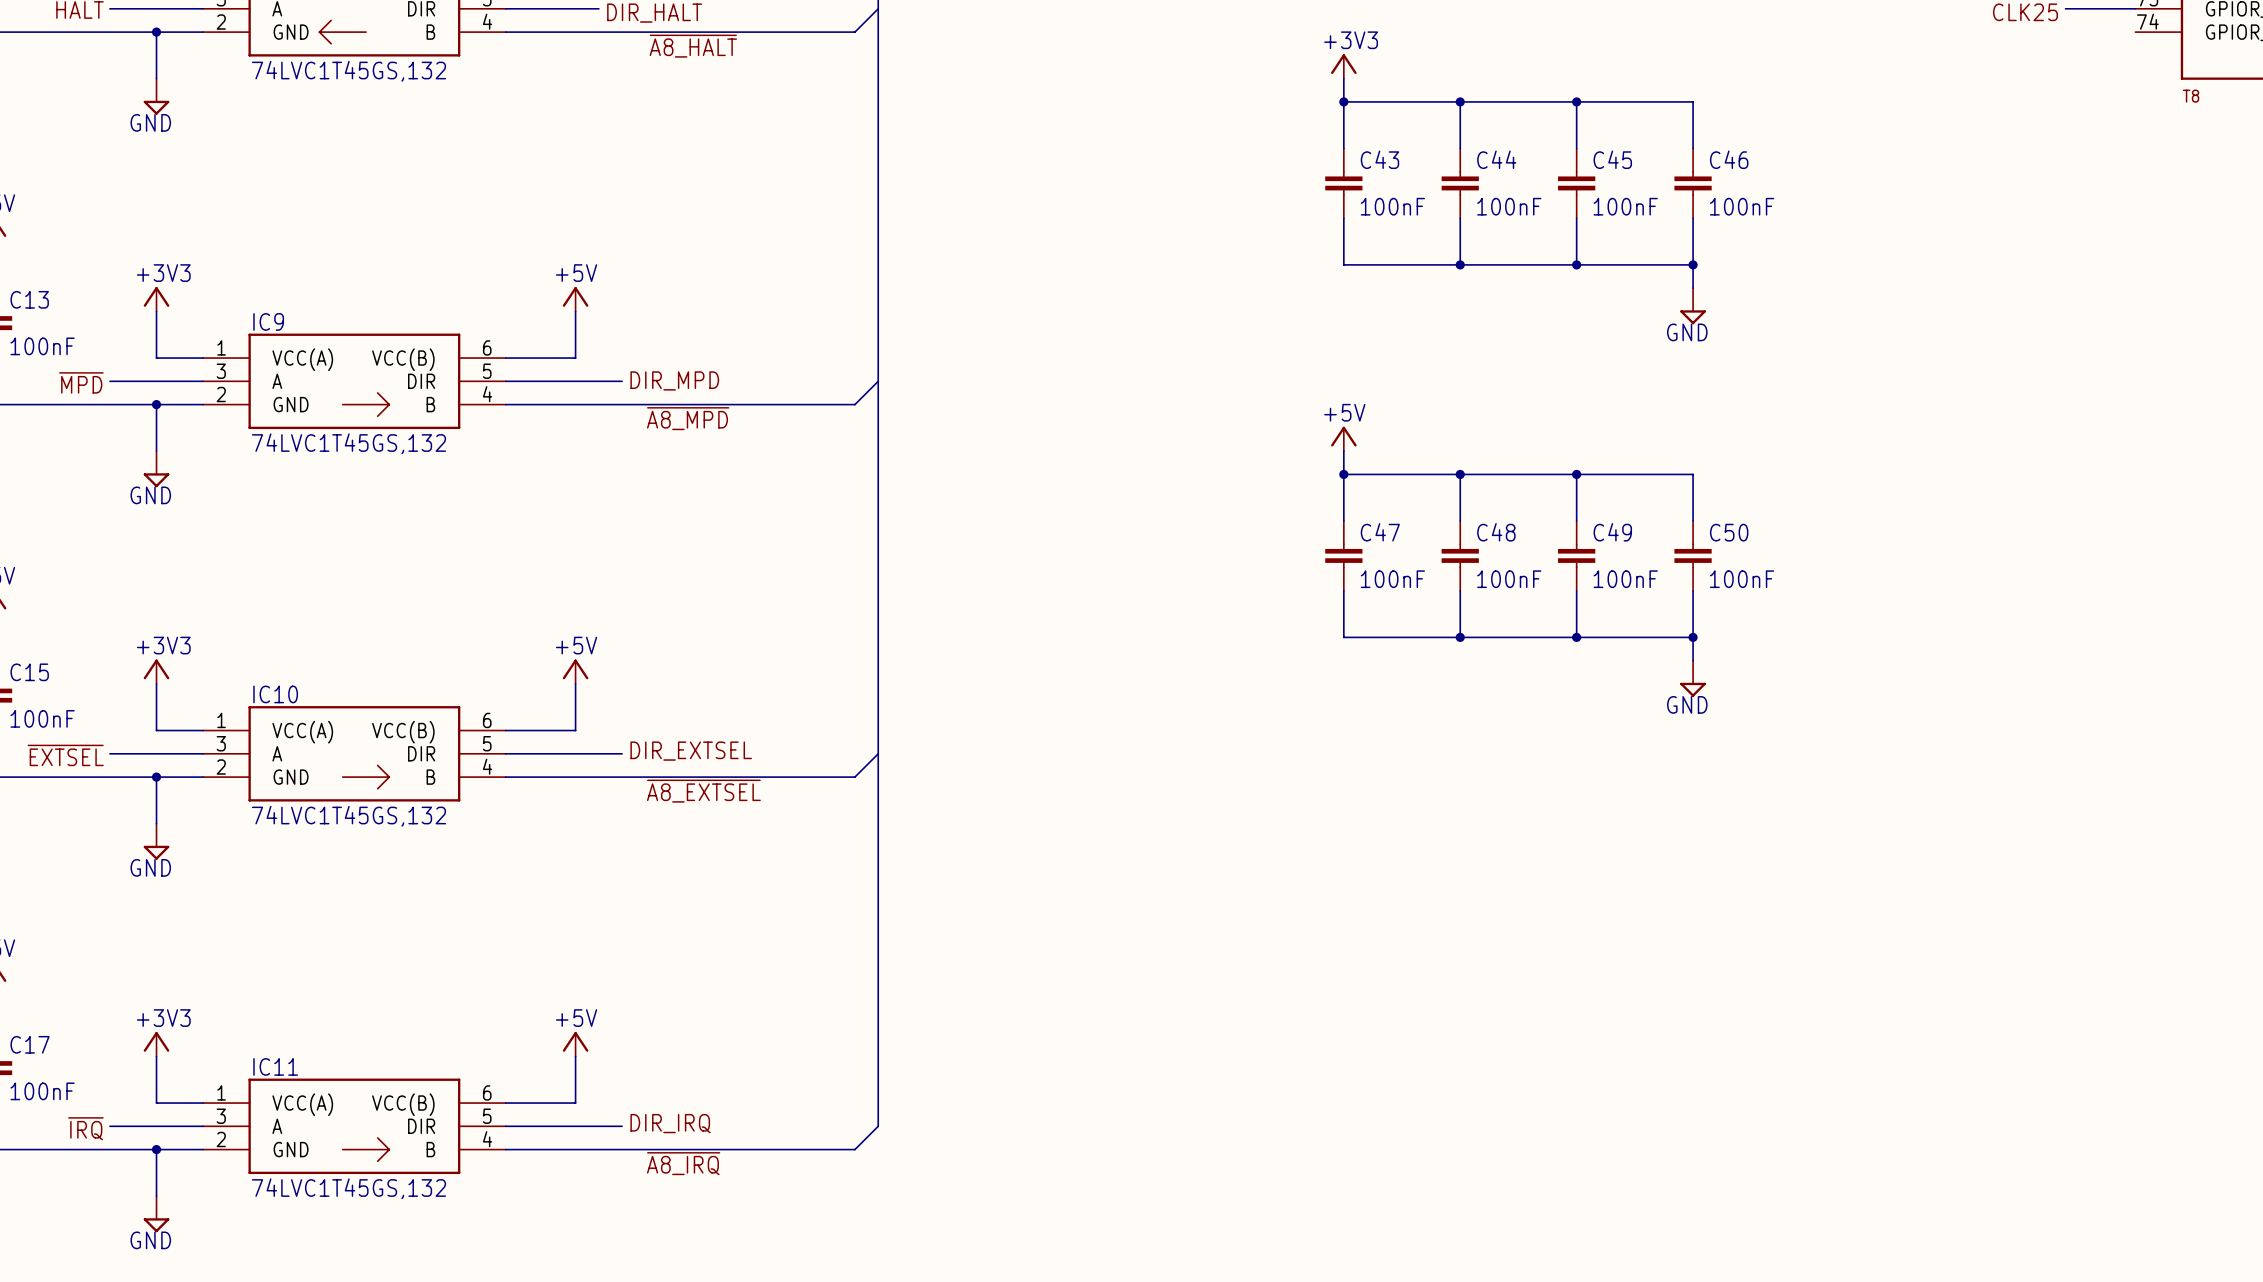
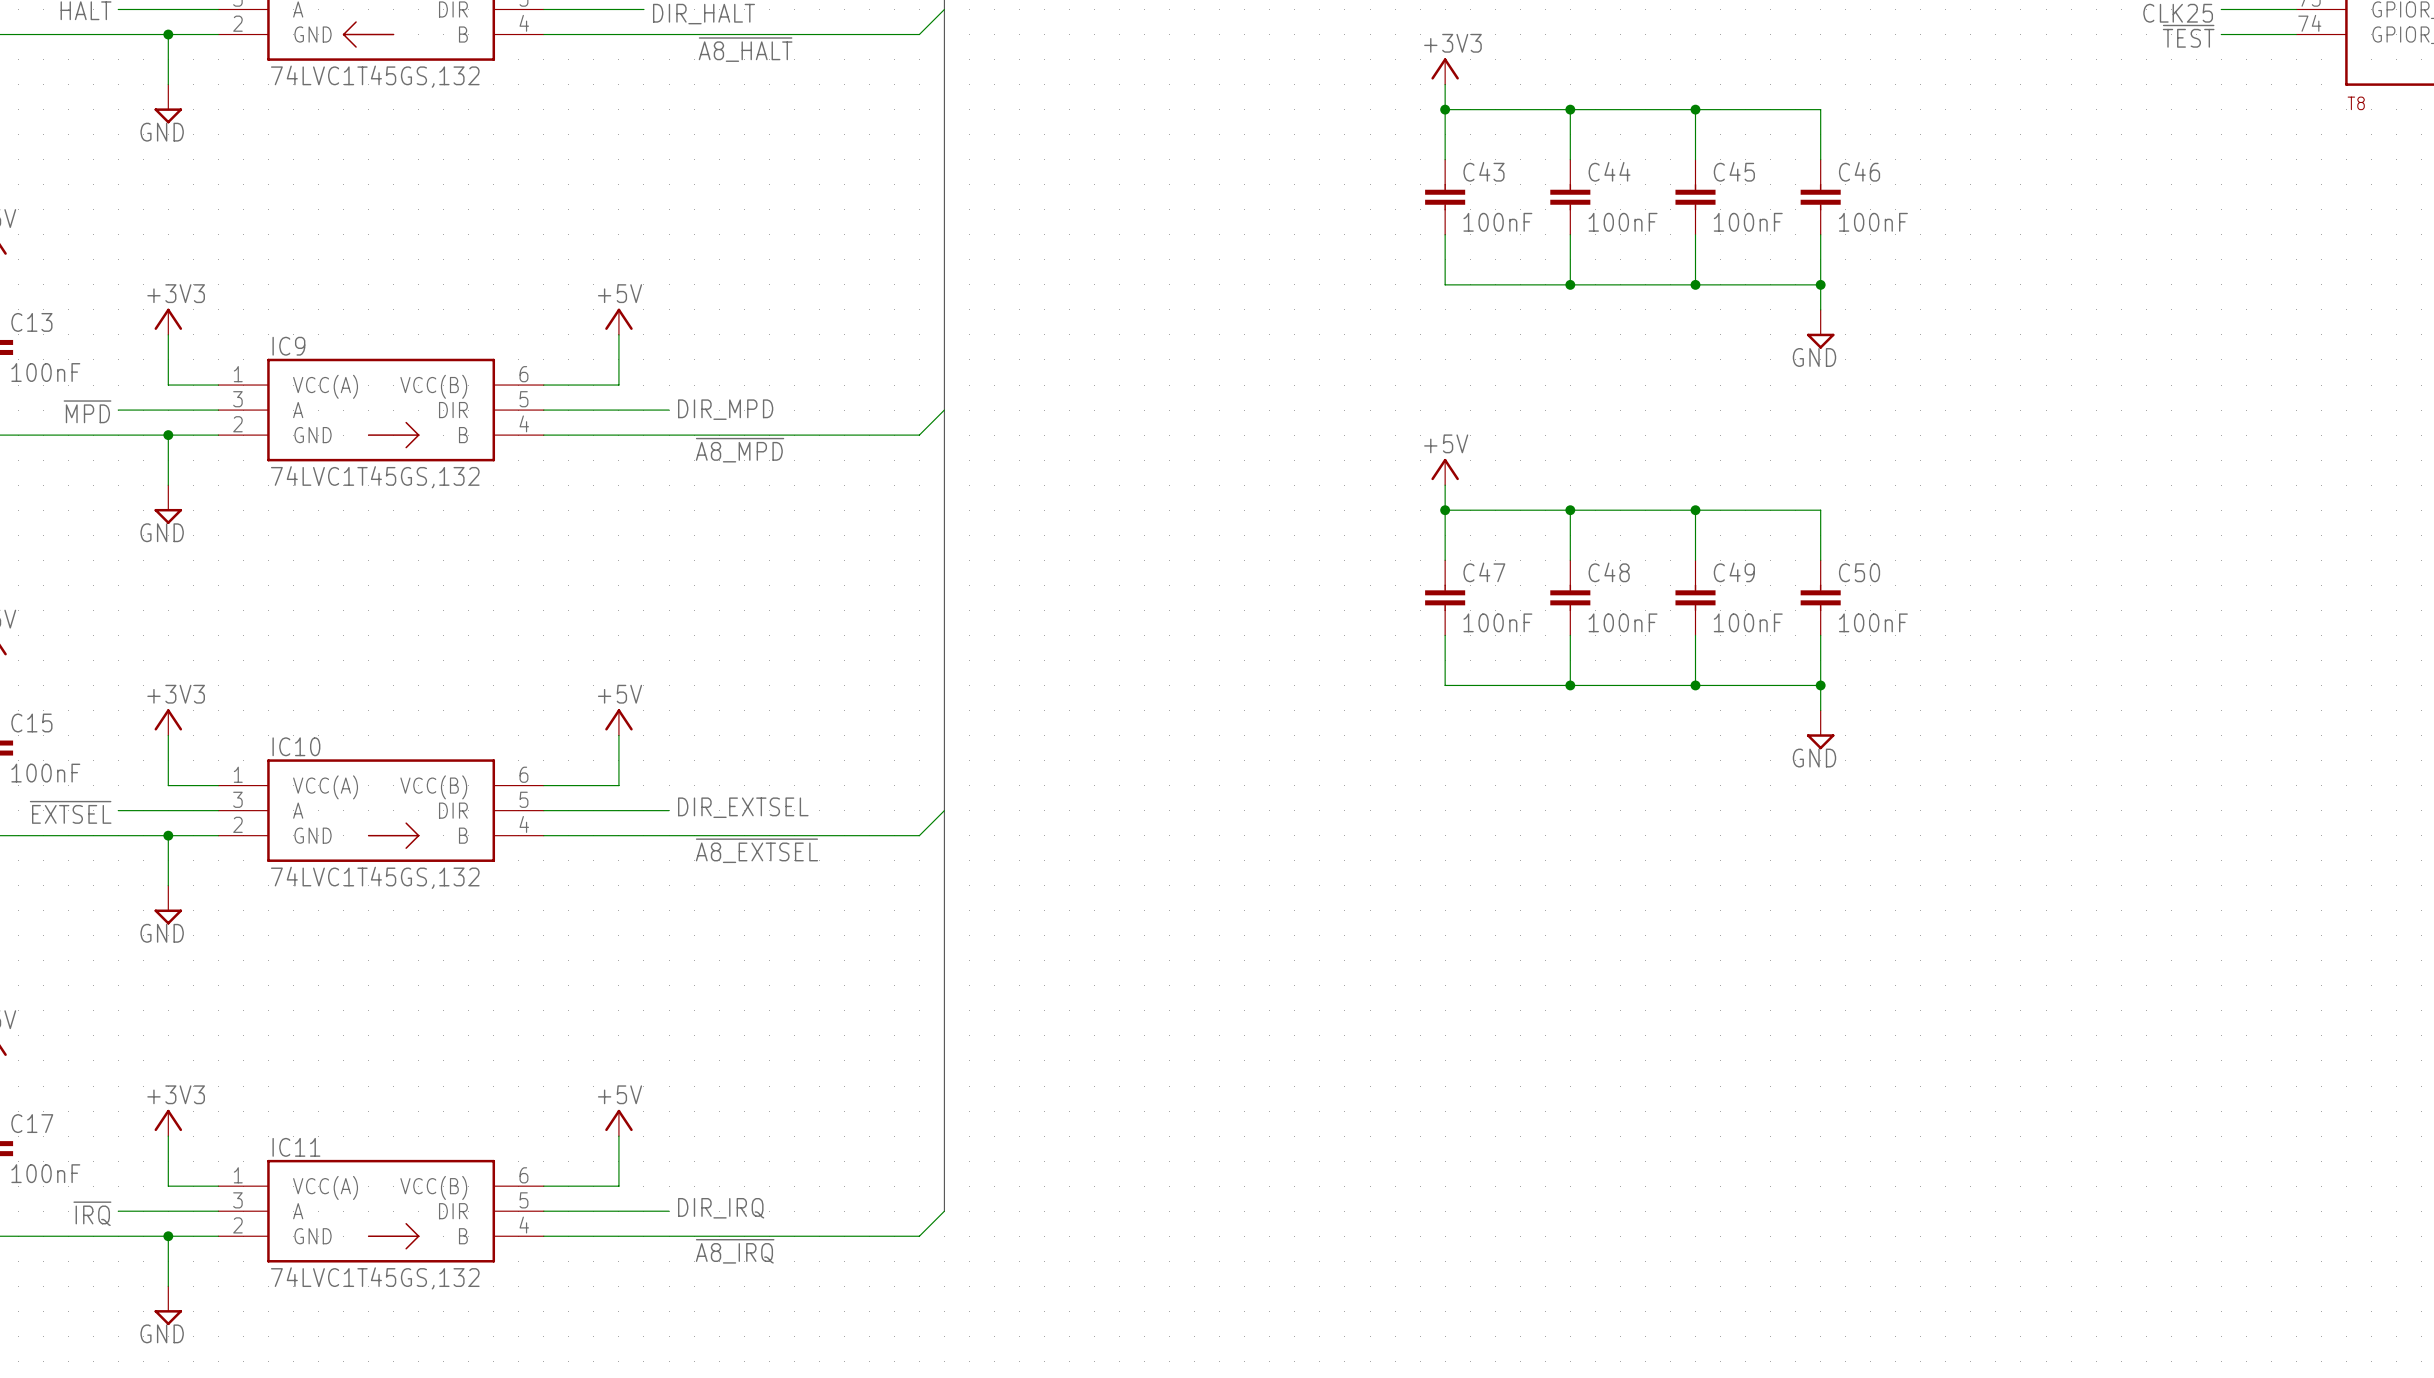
wire: none -> (2221, 34) (2296, 34)
label: none -> ~{TEST} (2188, 36)

